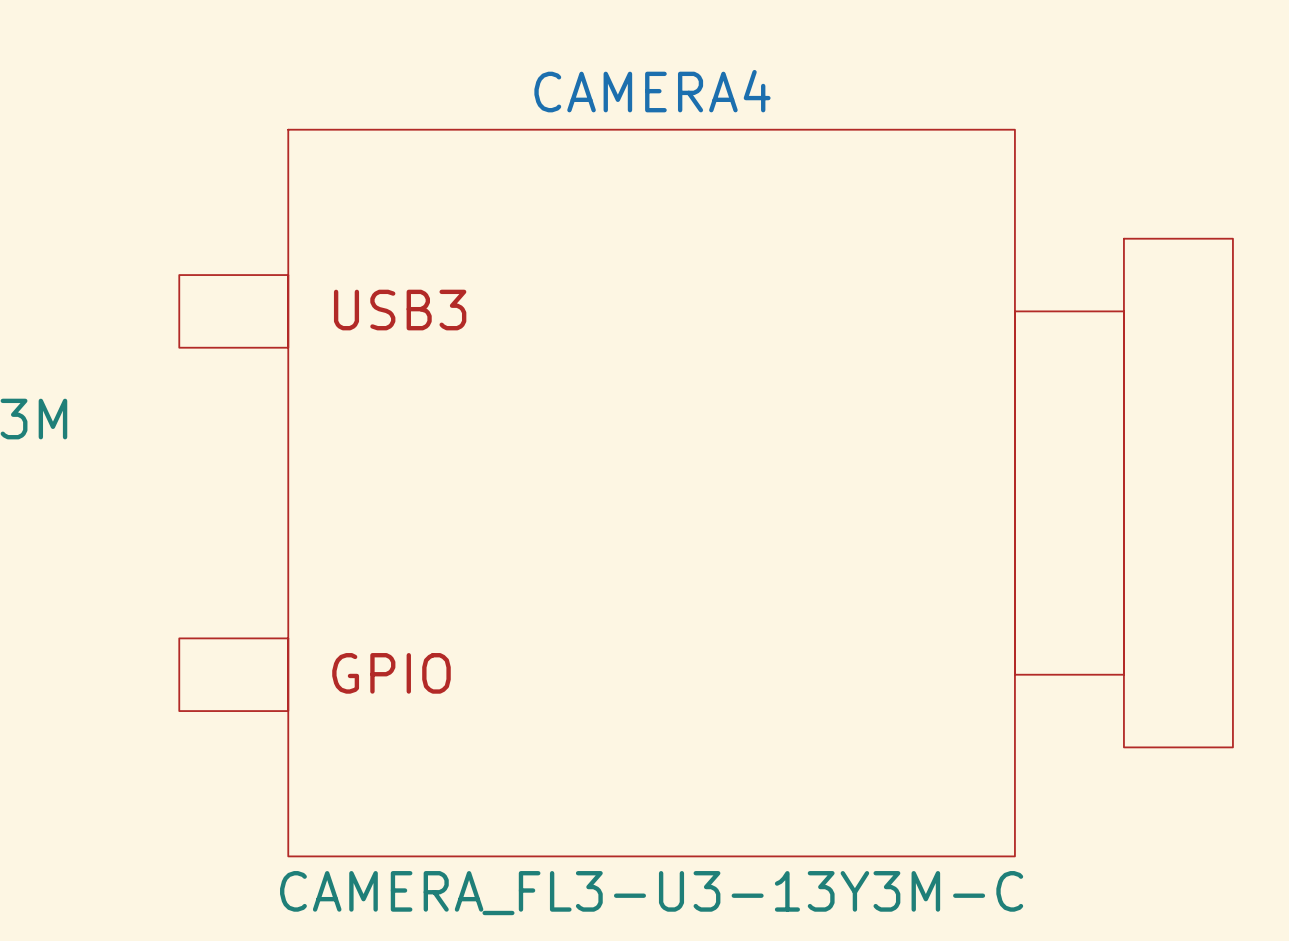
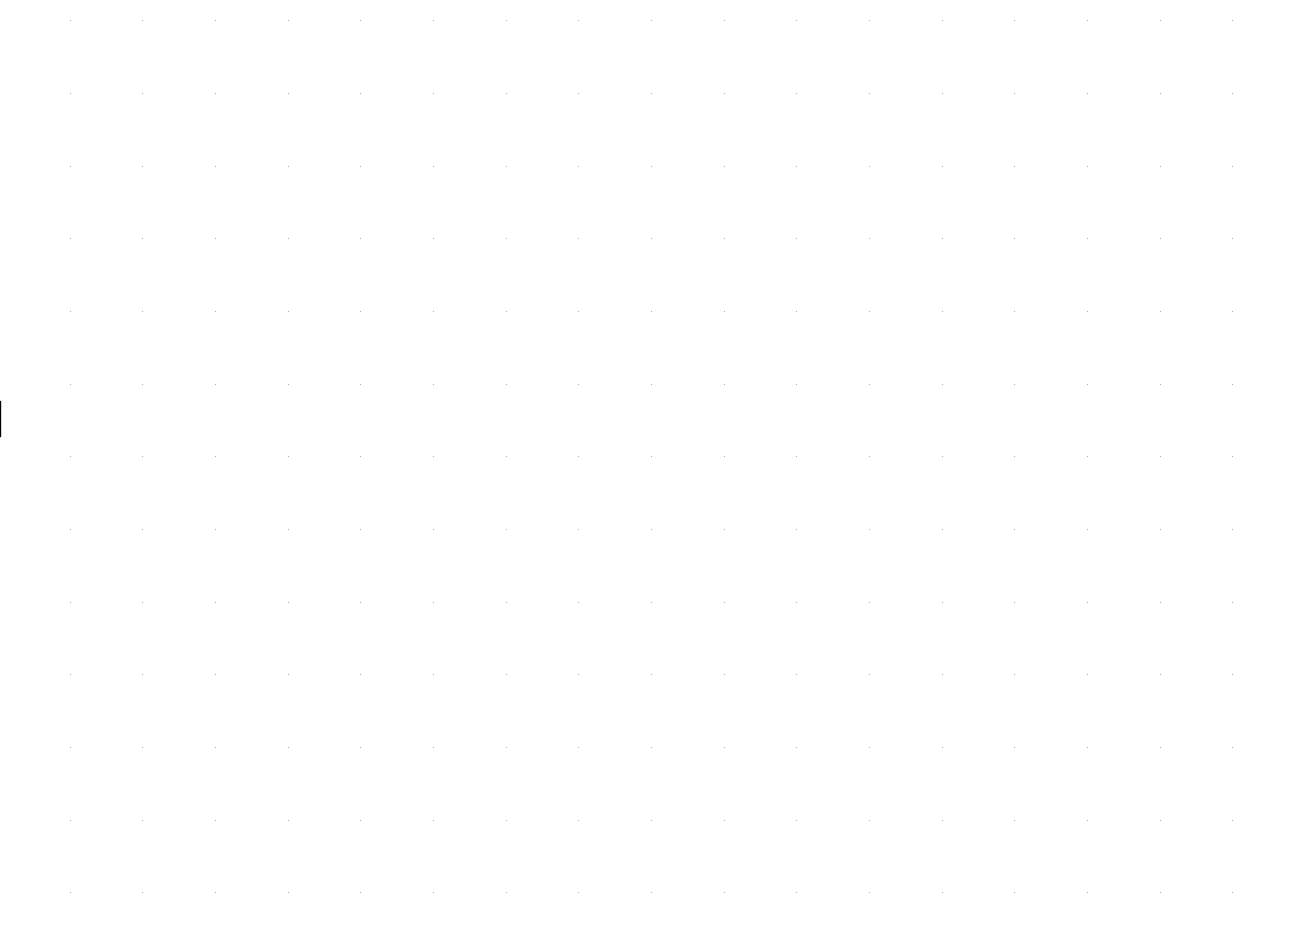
CAMERA4: CAMERA_FL3-U3-13Y3M-C (706, 493) -> none

